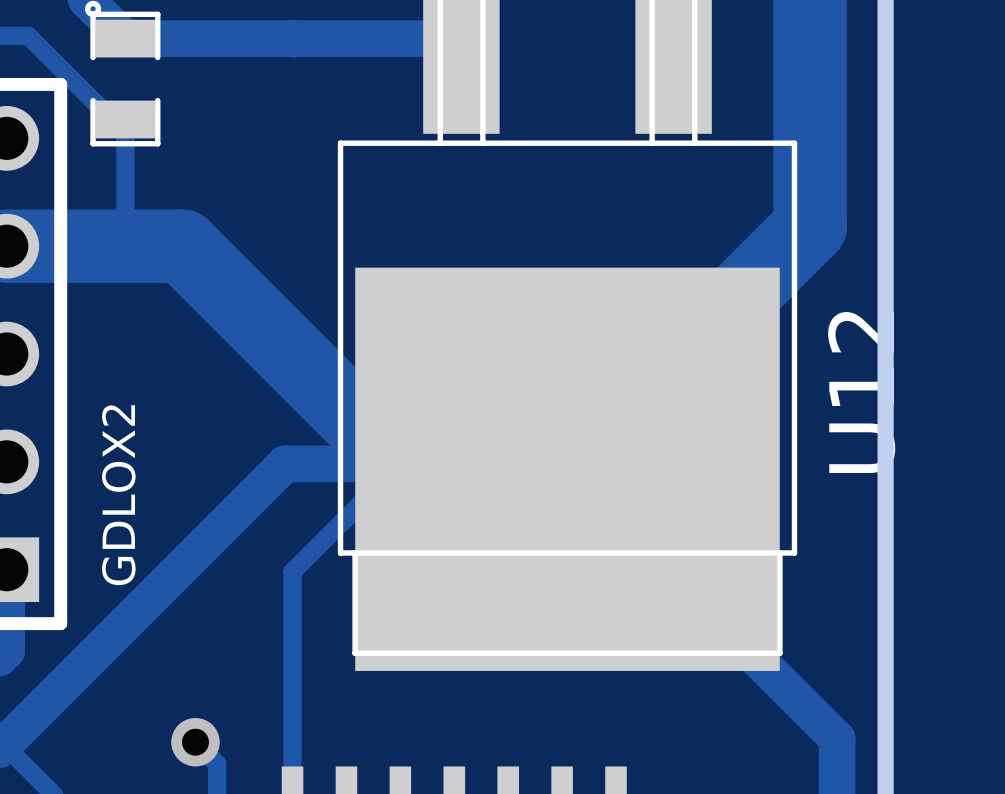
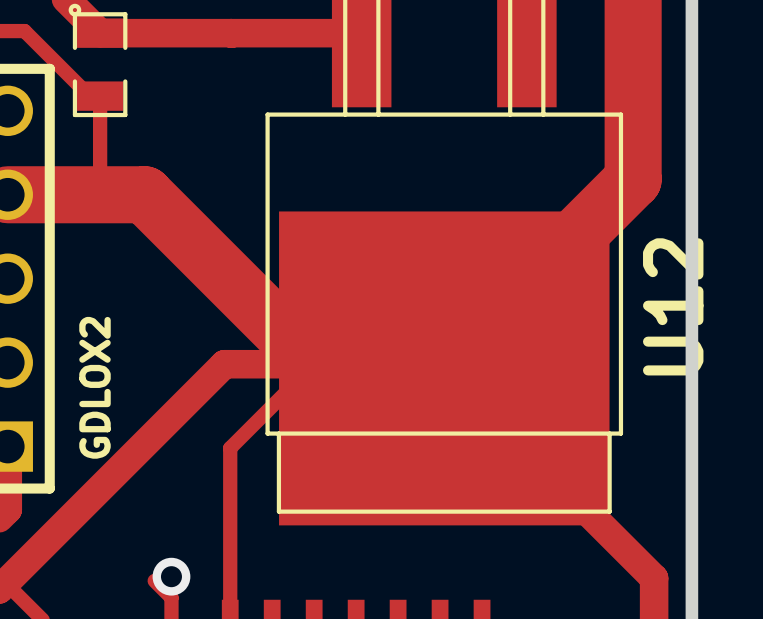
via position: (195, 742) -> (171, 576)

